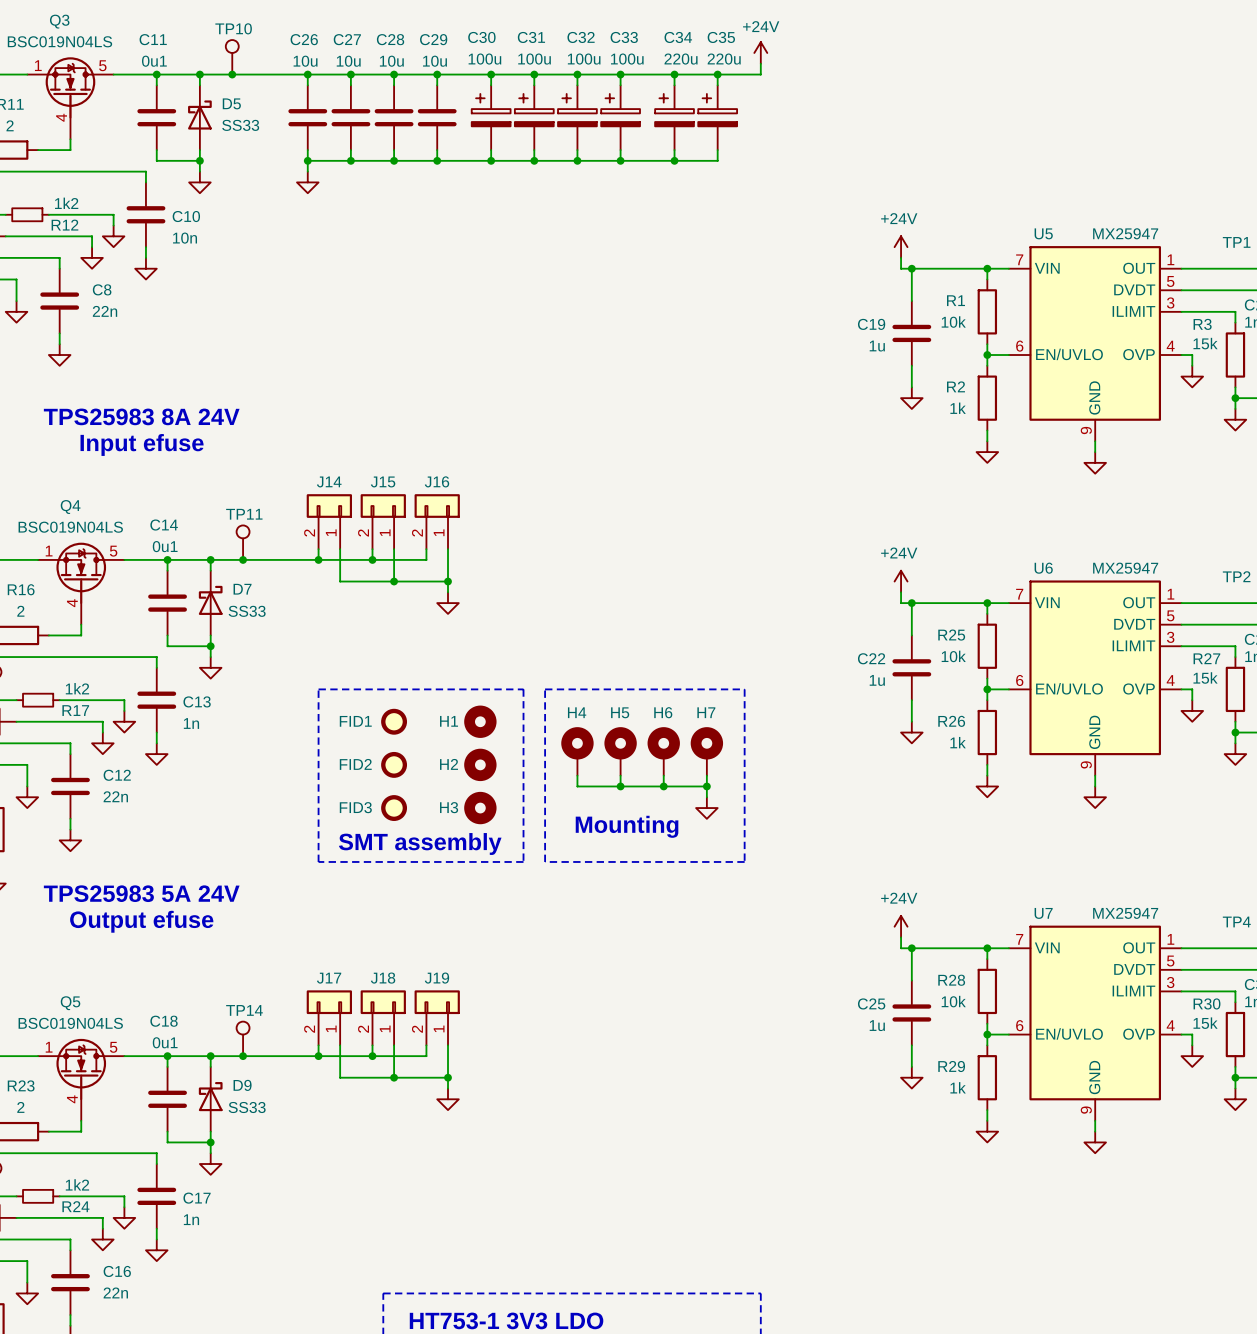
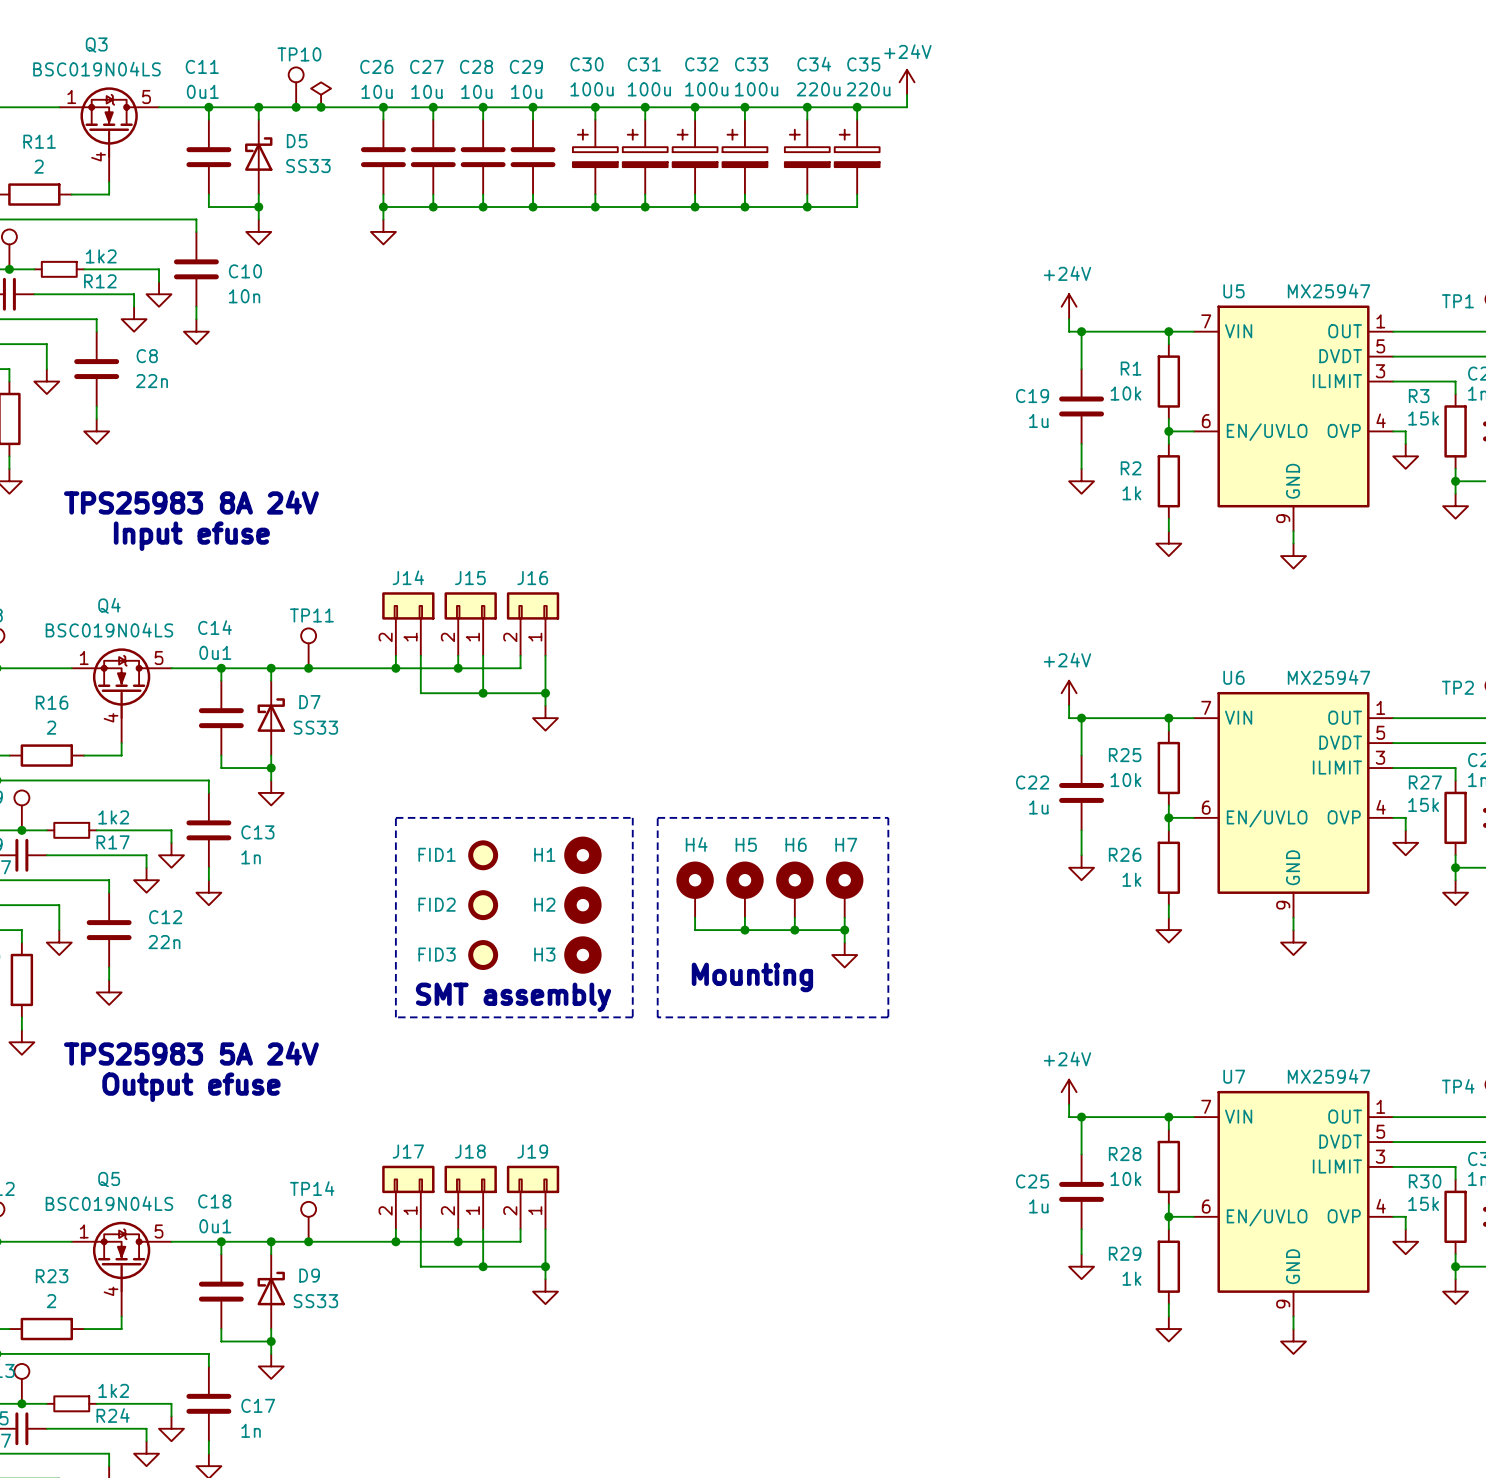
power symbol: none -> (321, 94)
junction: none -> (321, 107)

